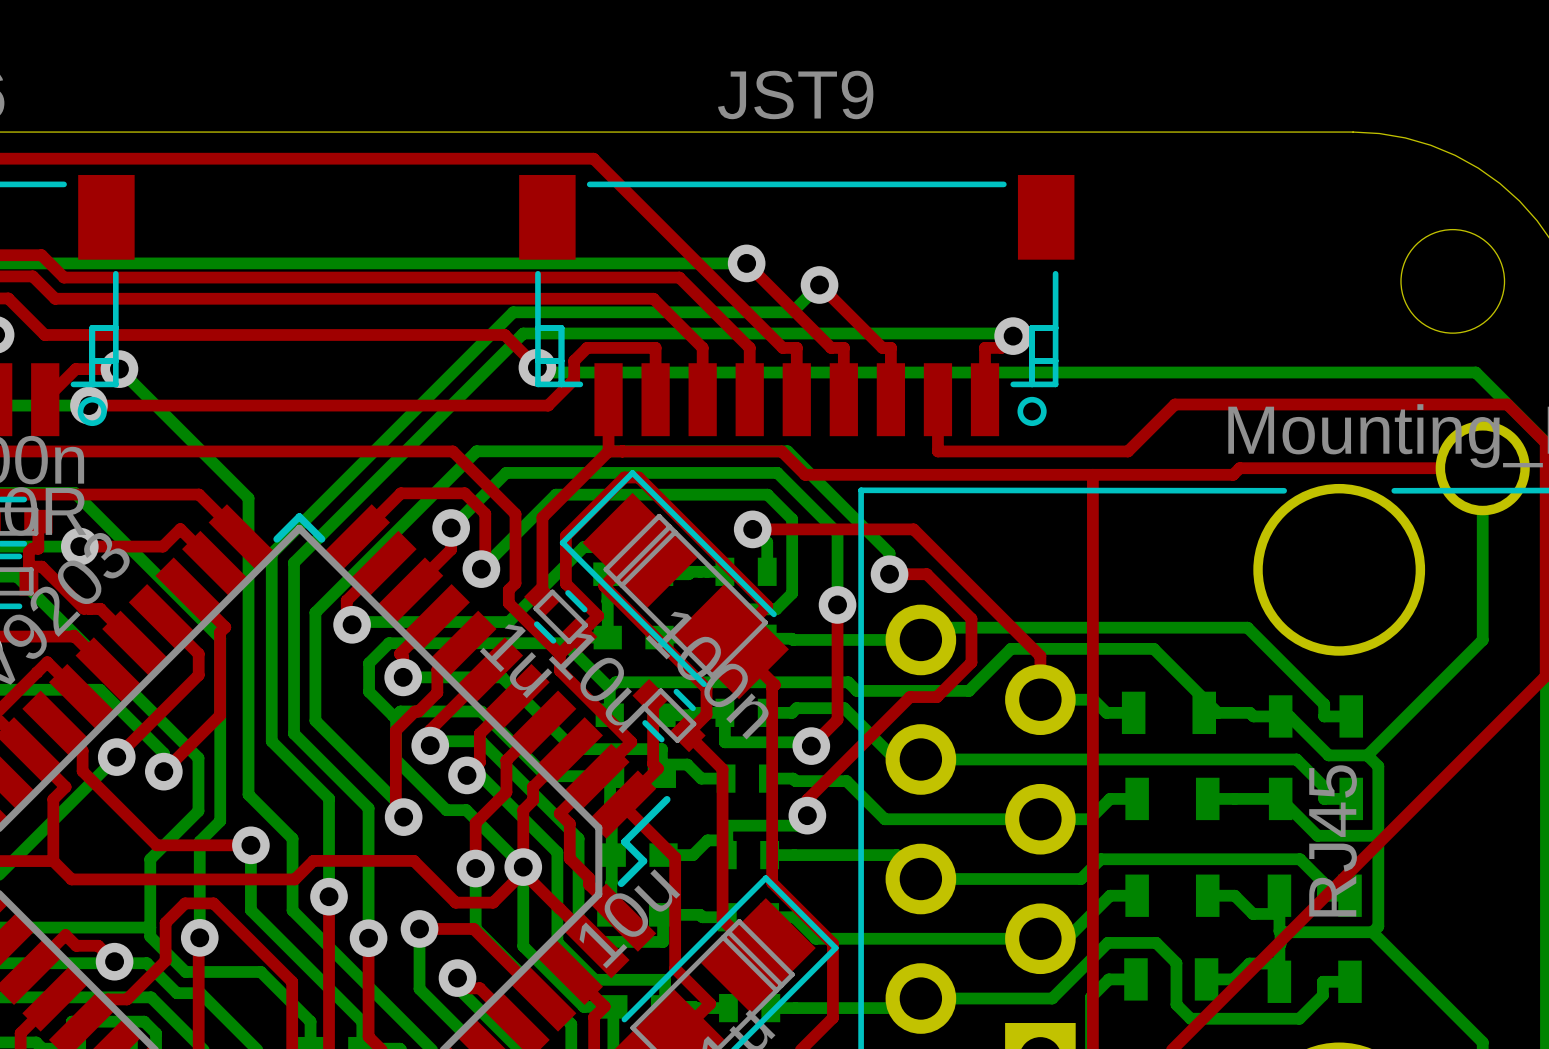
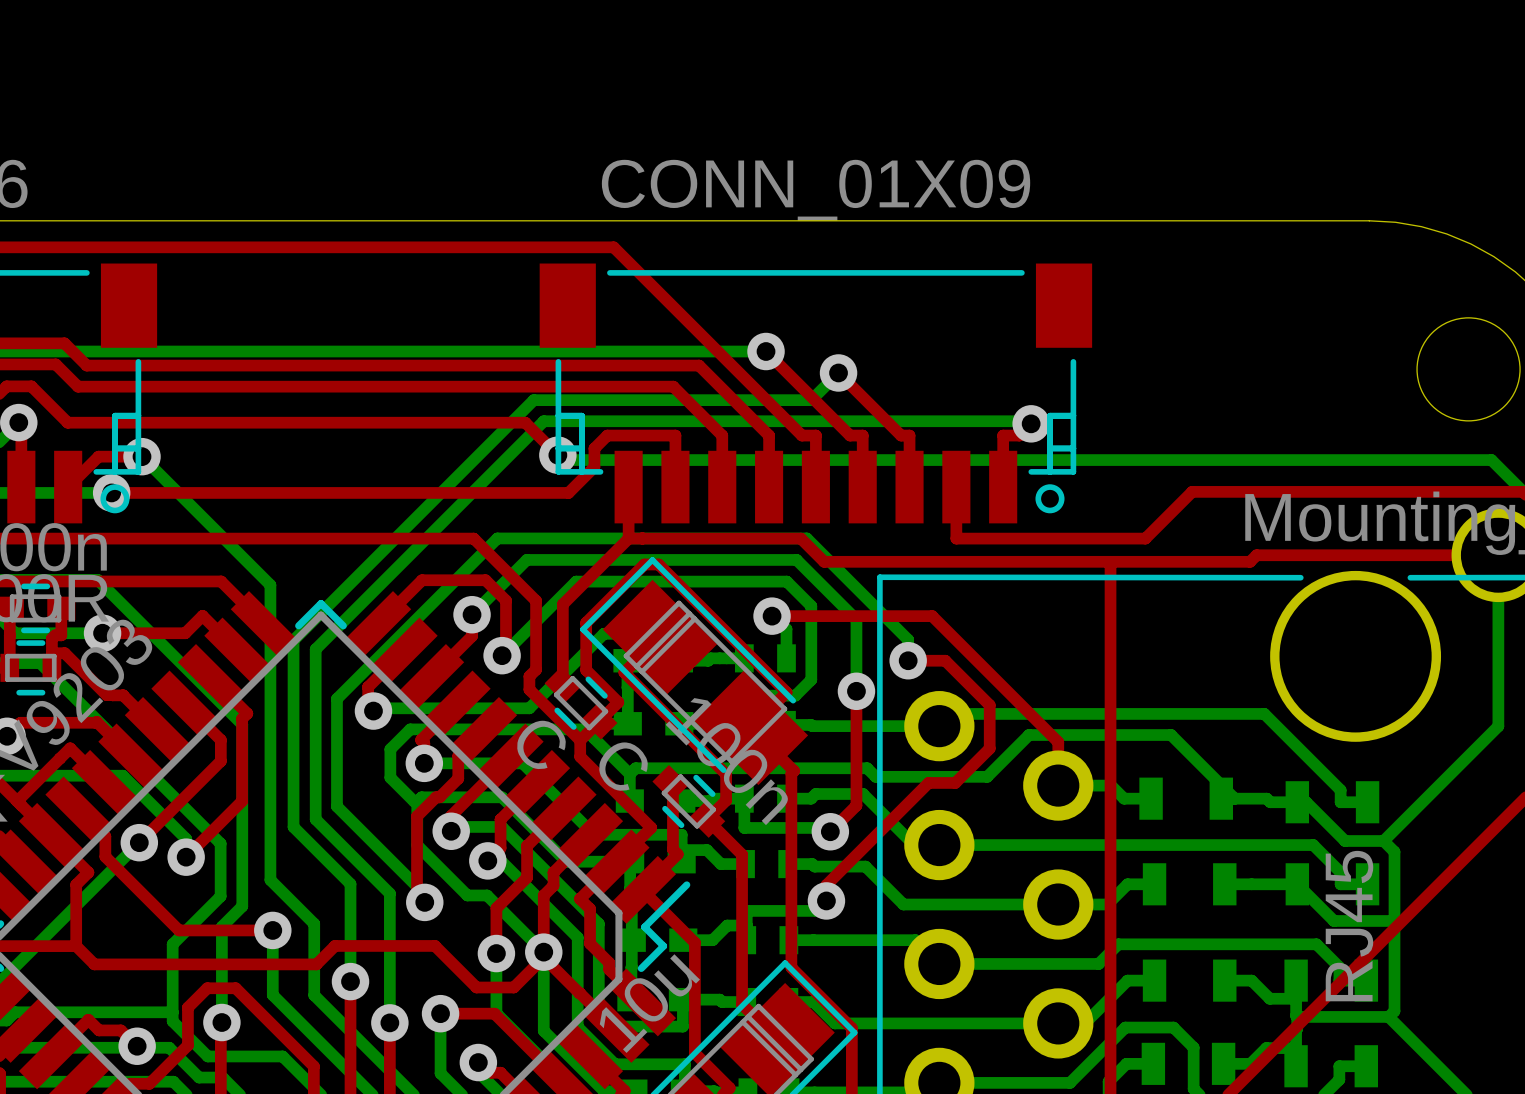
part value: JST9 (795, 94) -> CONN_01X09 (816, 190)
part value: 1u (516, 661) -> C (541, 745)
part value: 10u (598, 683) -> C (623, 766)

